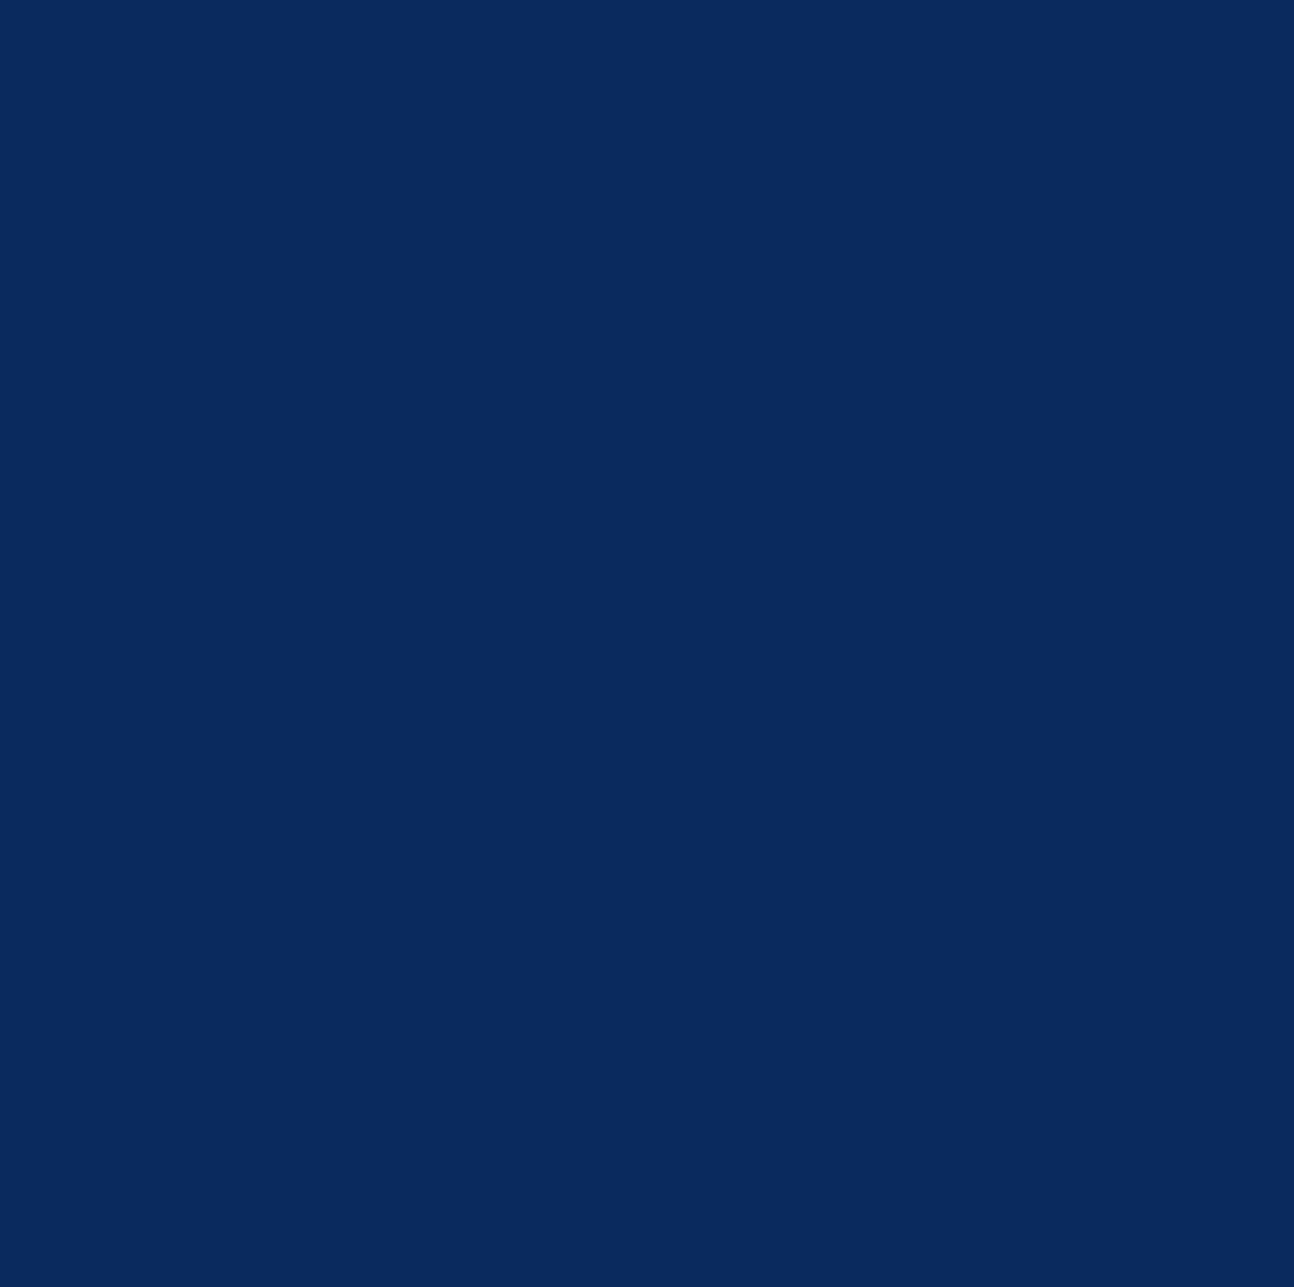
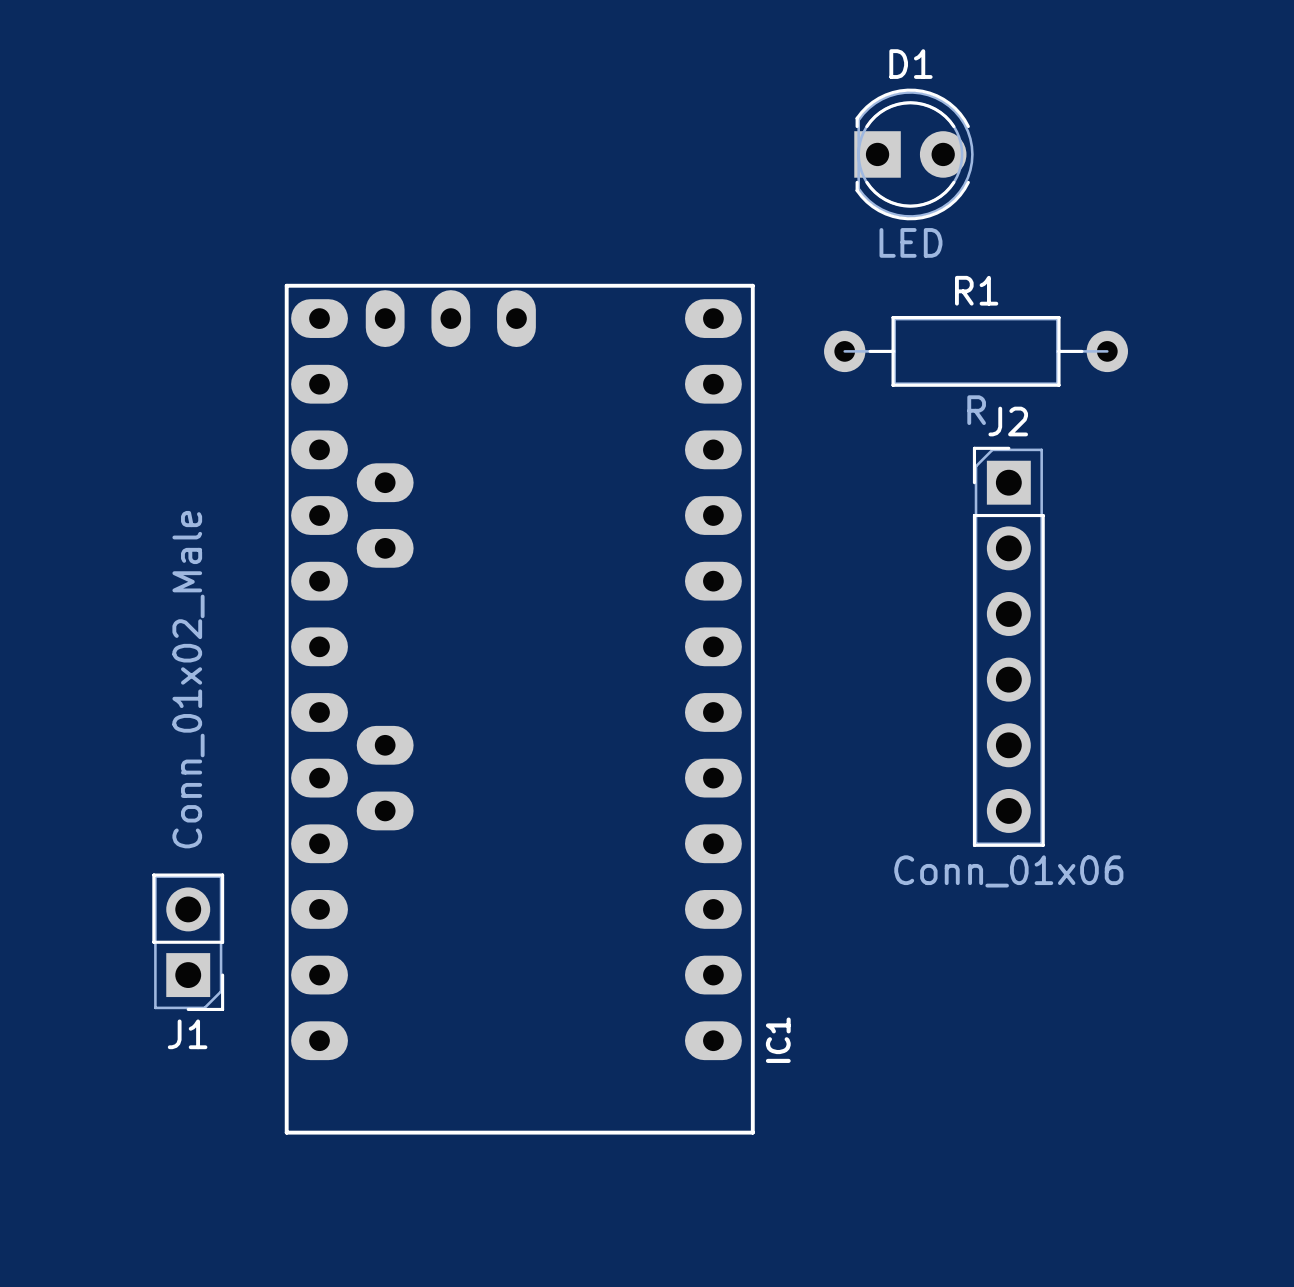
D1: none -> LED (913, 154)
R1: none -> R (976, 351)
J2: none -> Conn_01x06 (1008, 646)
IC1: none -> (519, 709)
J1: none -> Conn_01x02_Male (188, 942)

